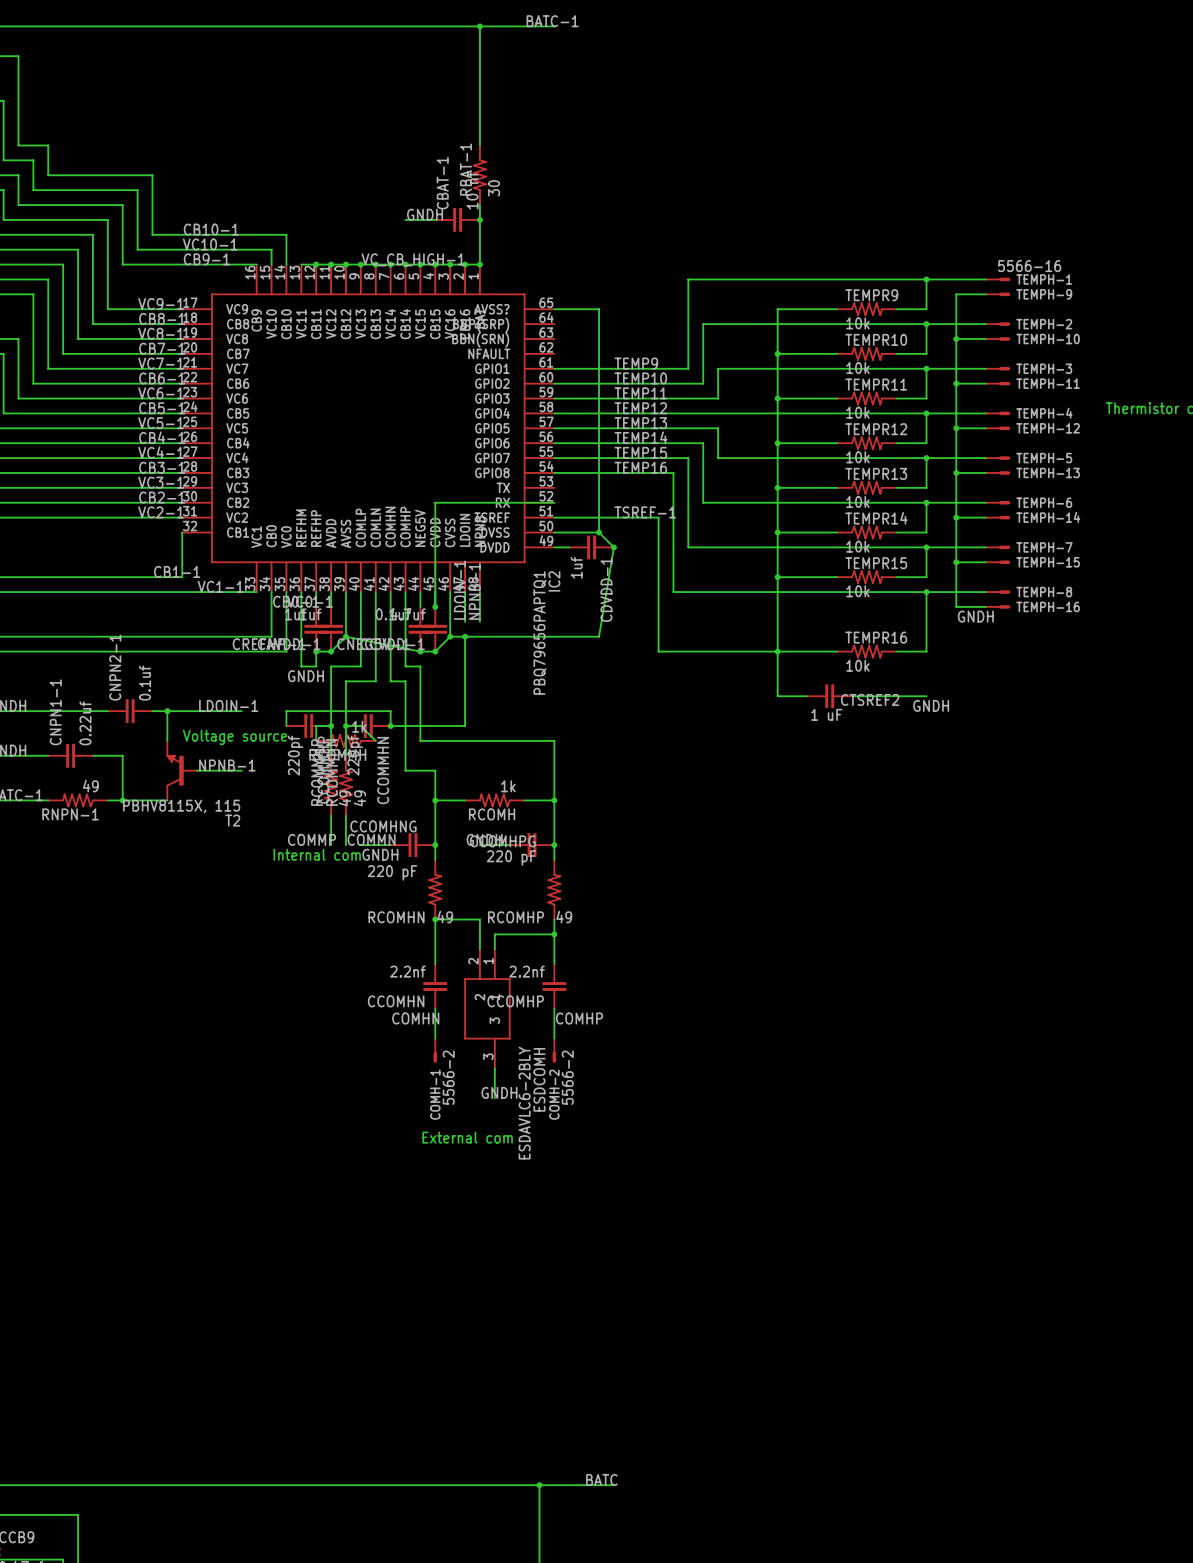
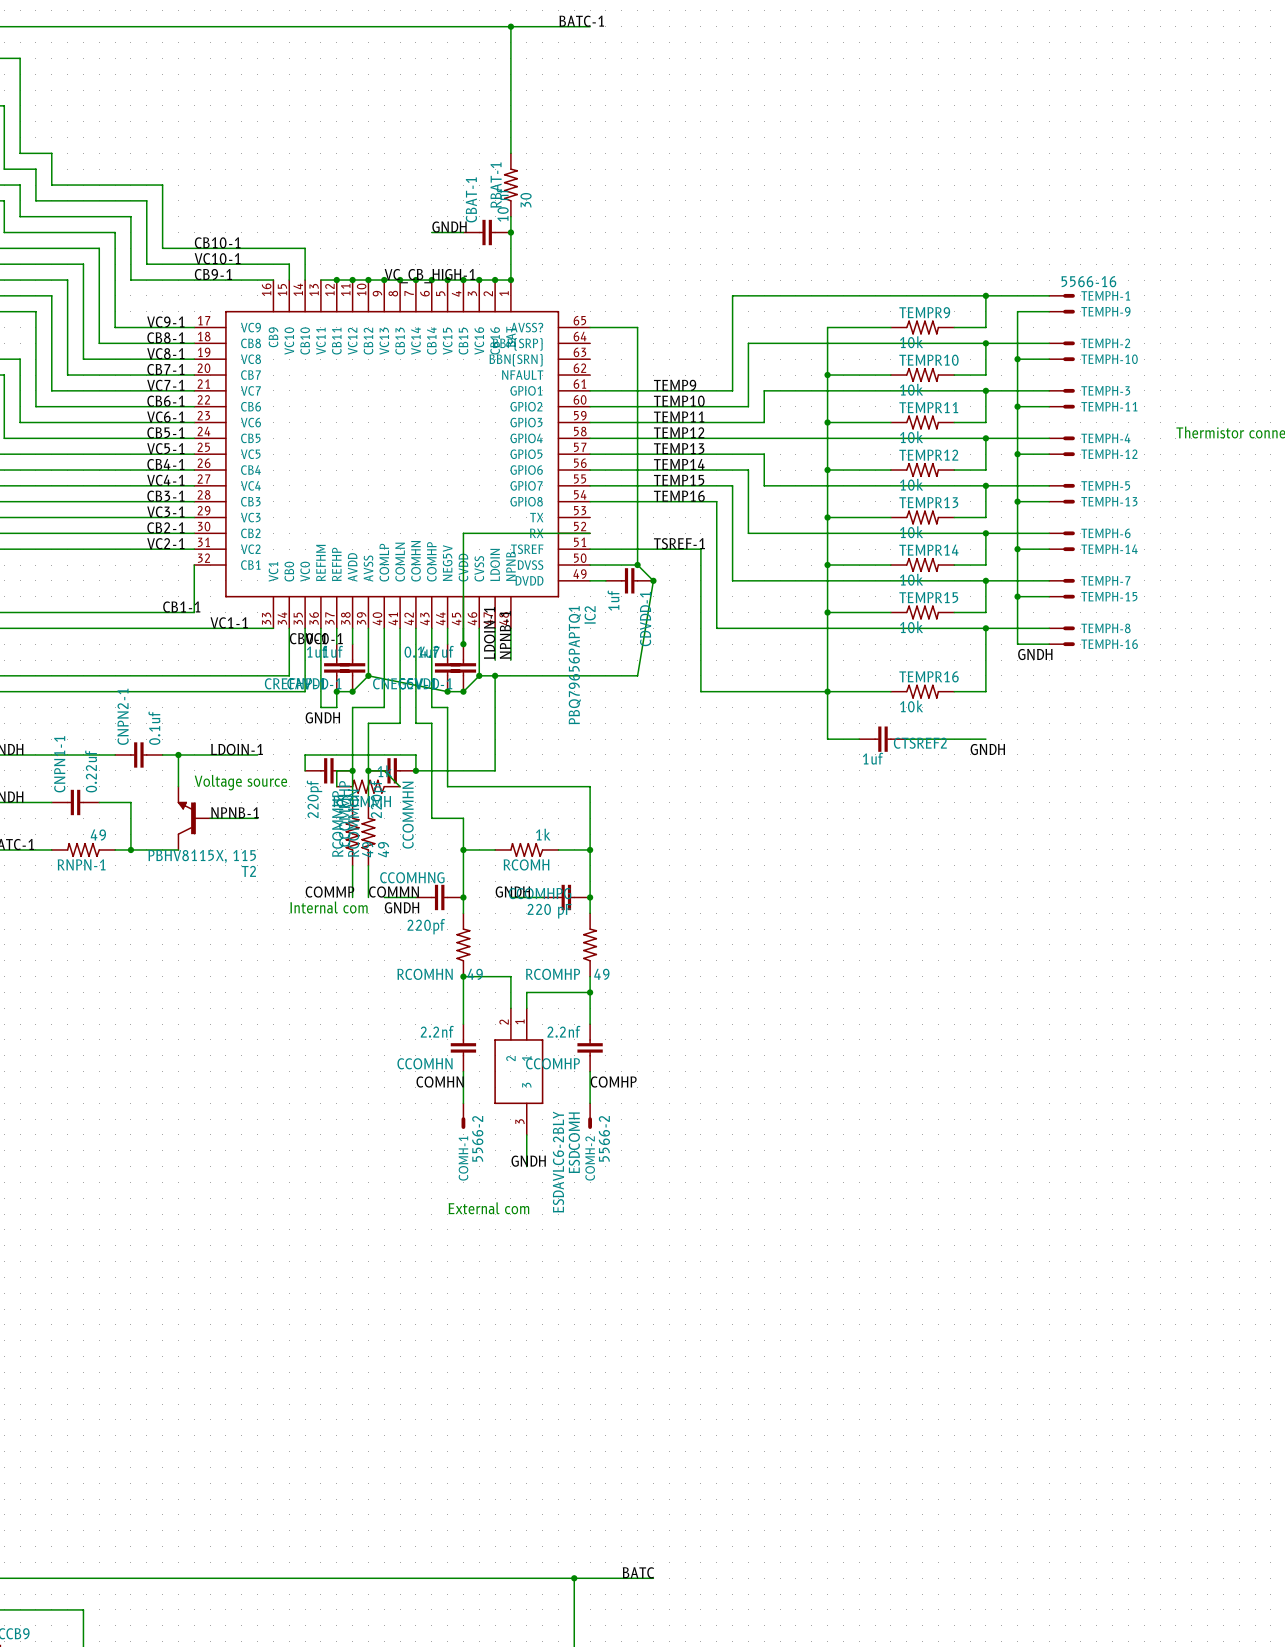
CTSREF2 value: 1 uF (826, 714) -> 1uf (873, 758)
CCOMHNG value: 220 pF (392, 872) -> 220pf (426, 926)

